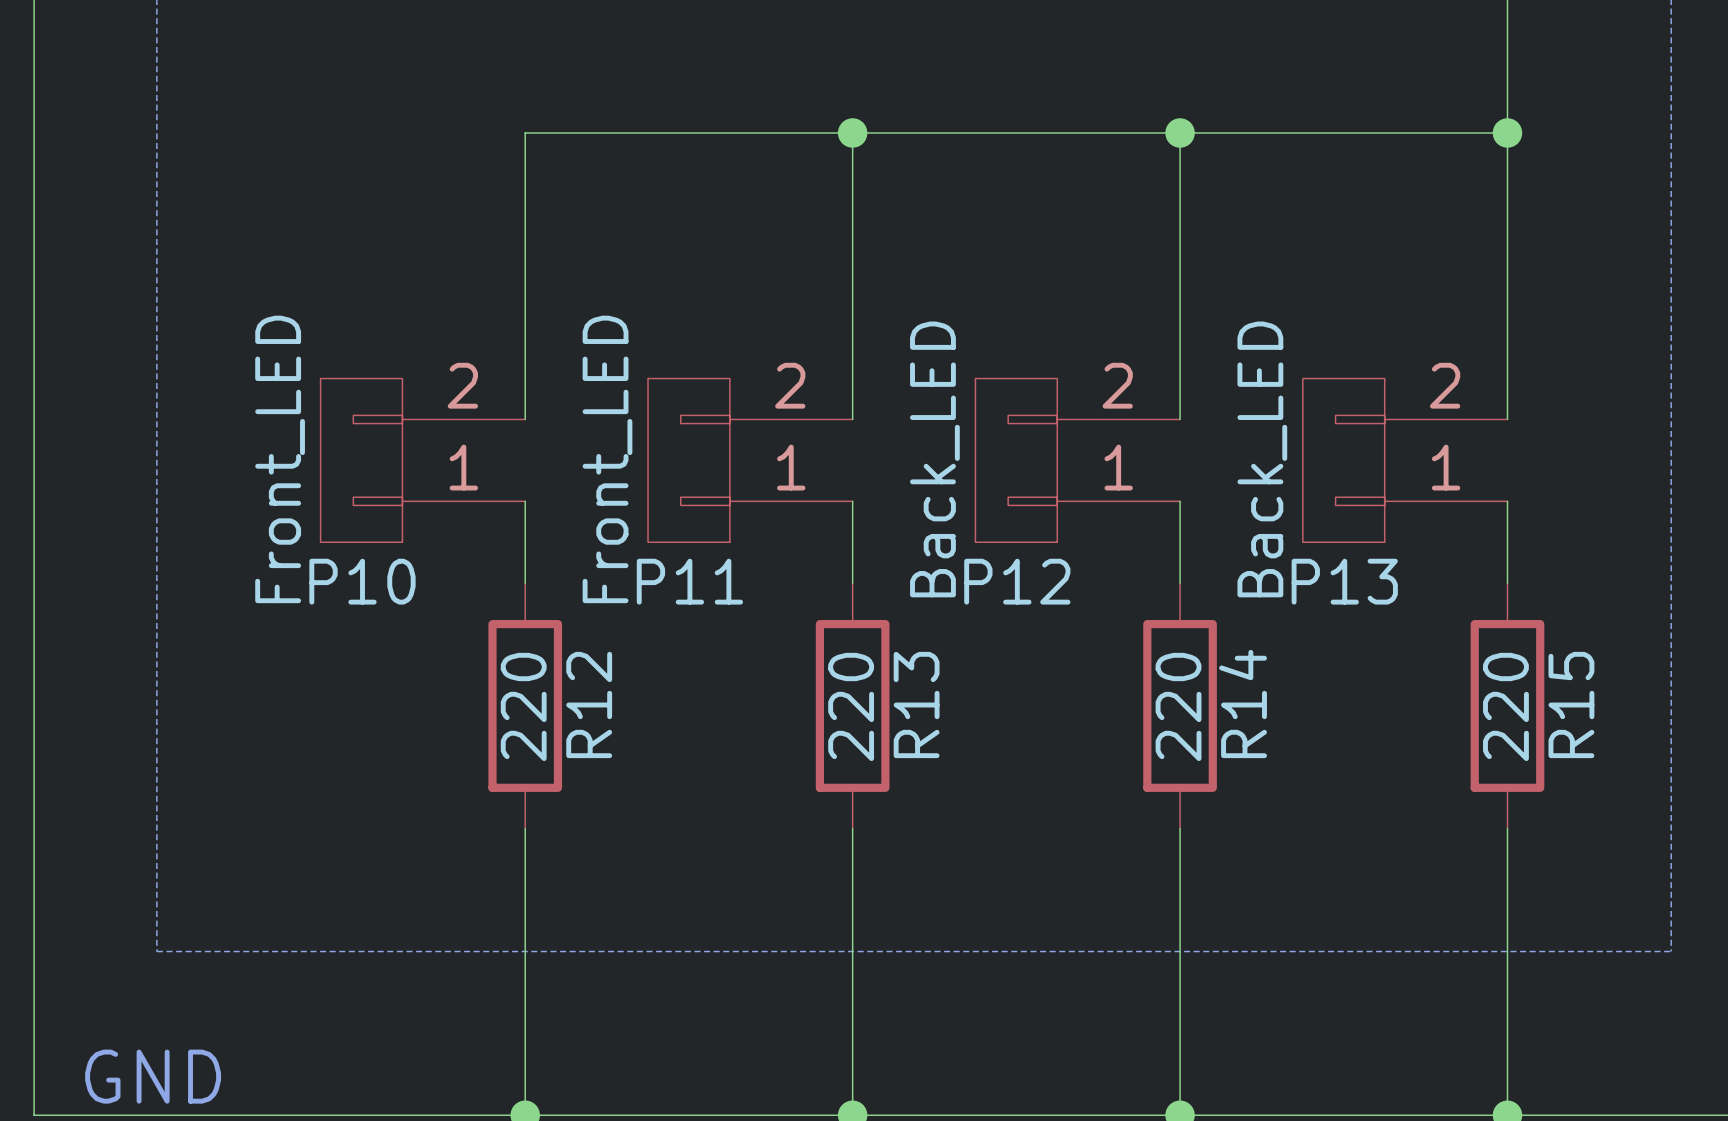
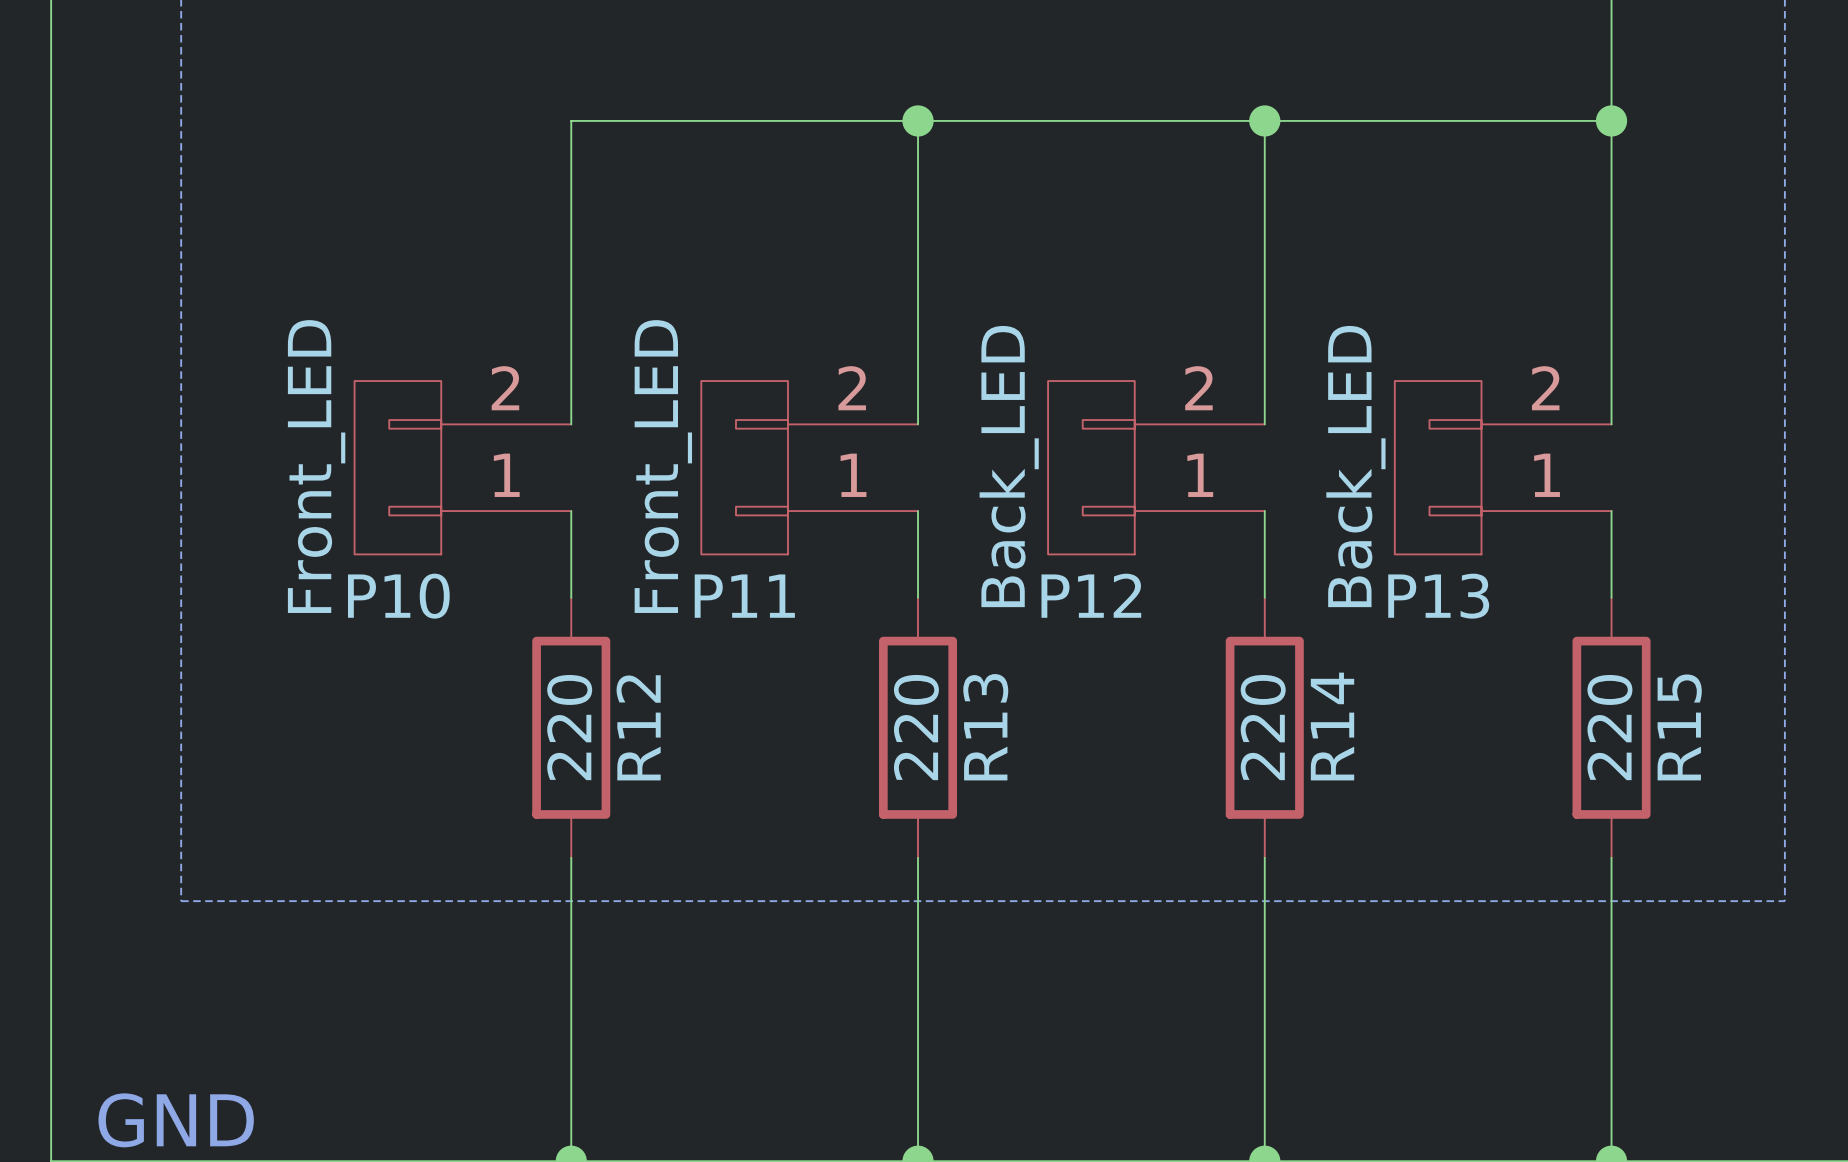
line: (156, 869) (156, 951) (1671, 951) (1671, 869) -> (181, 901) (1784, 901)

